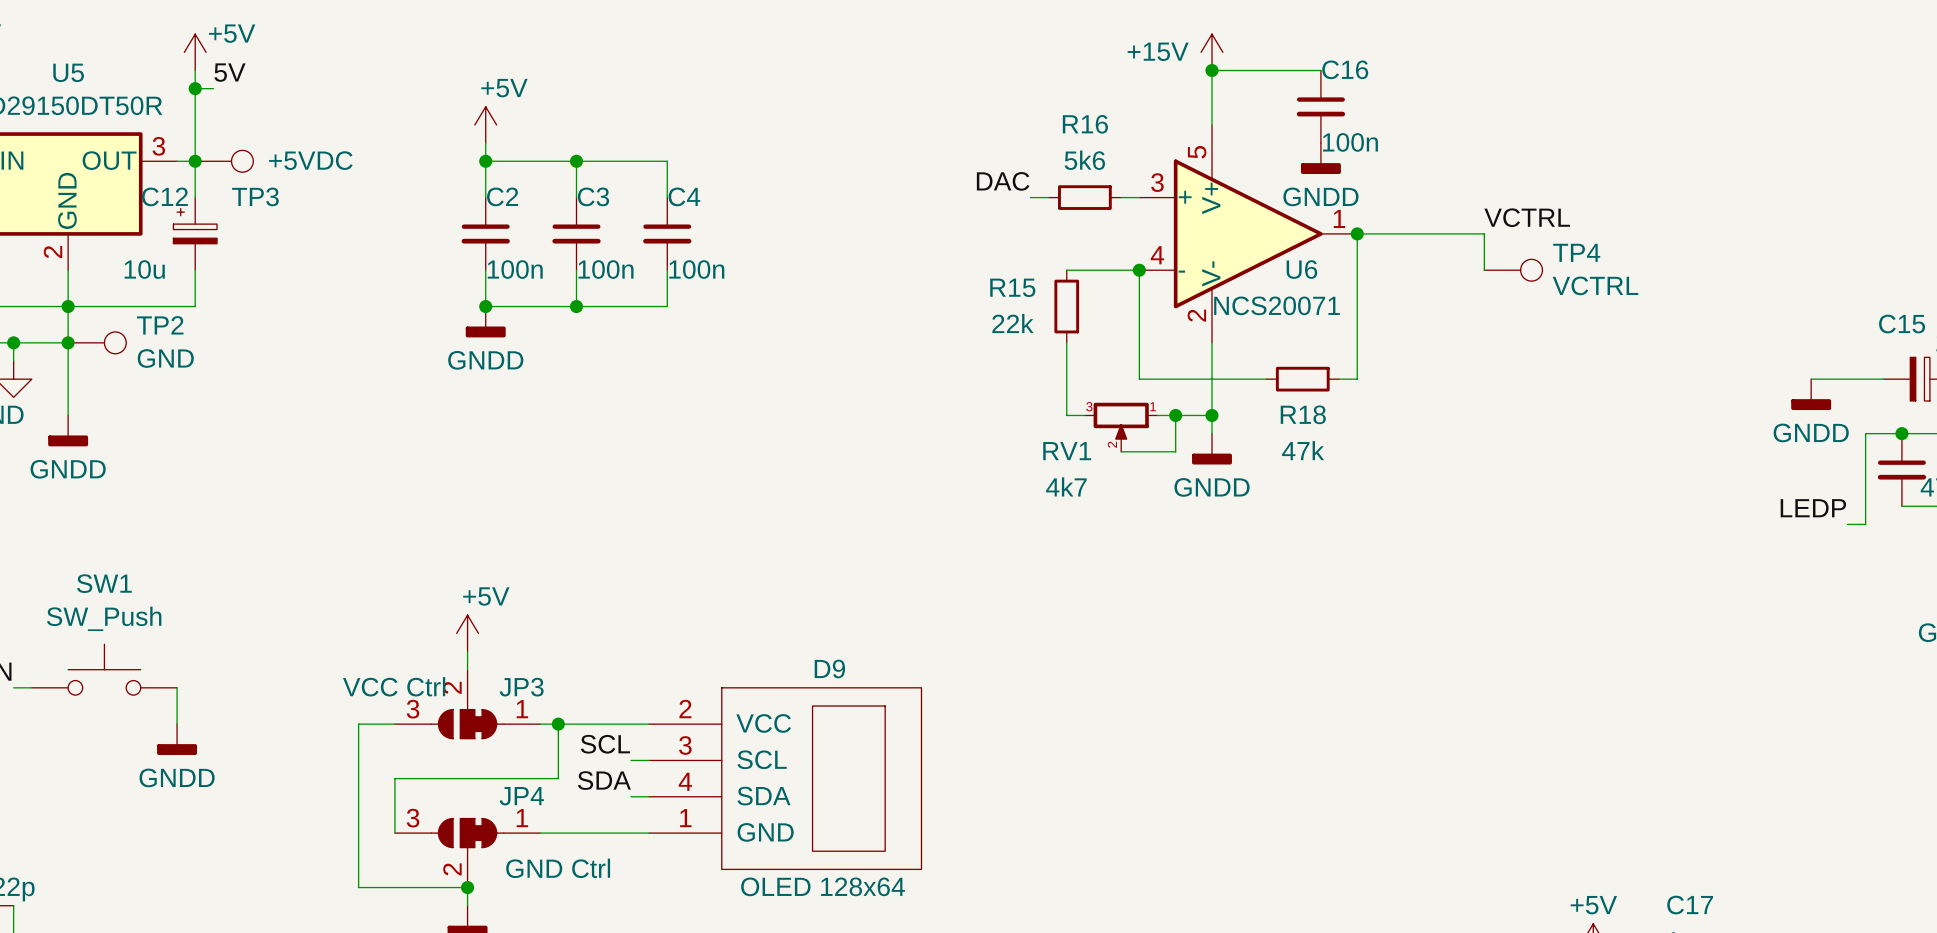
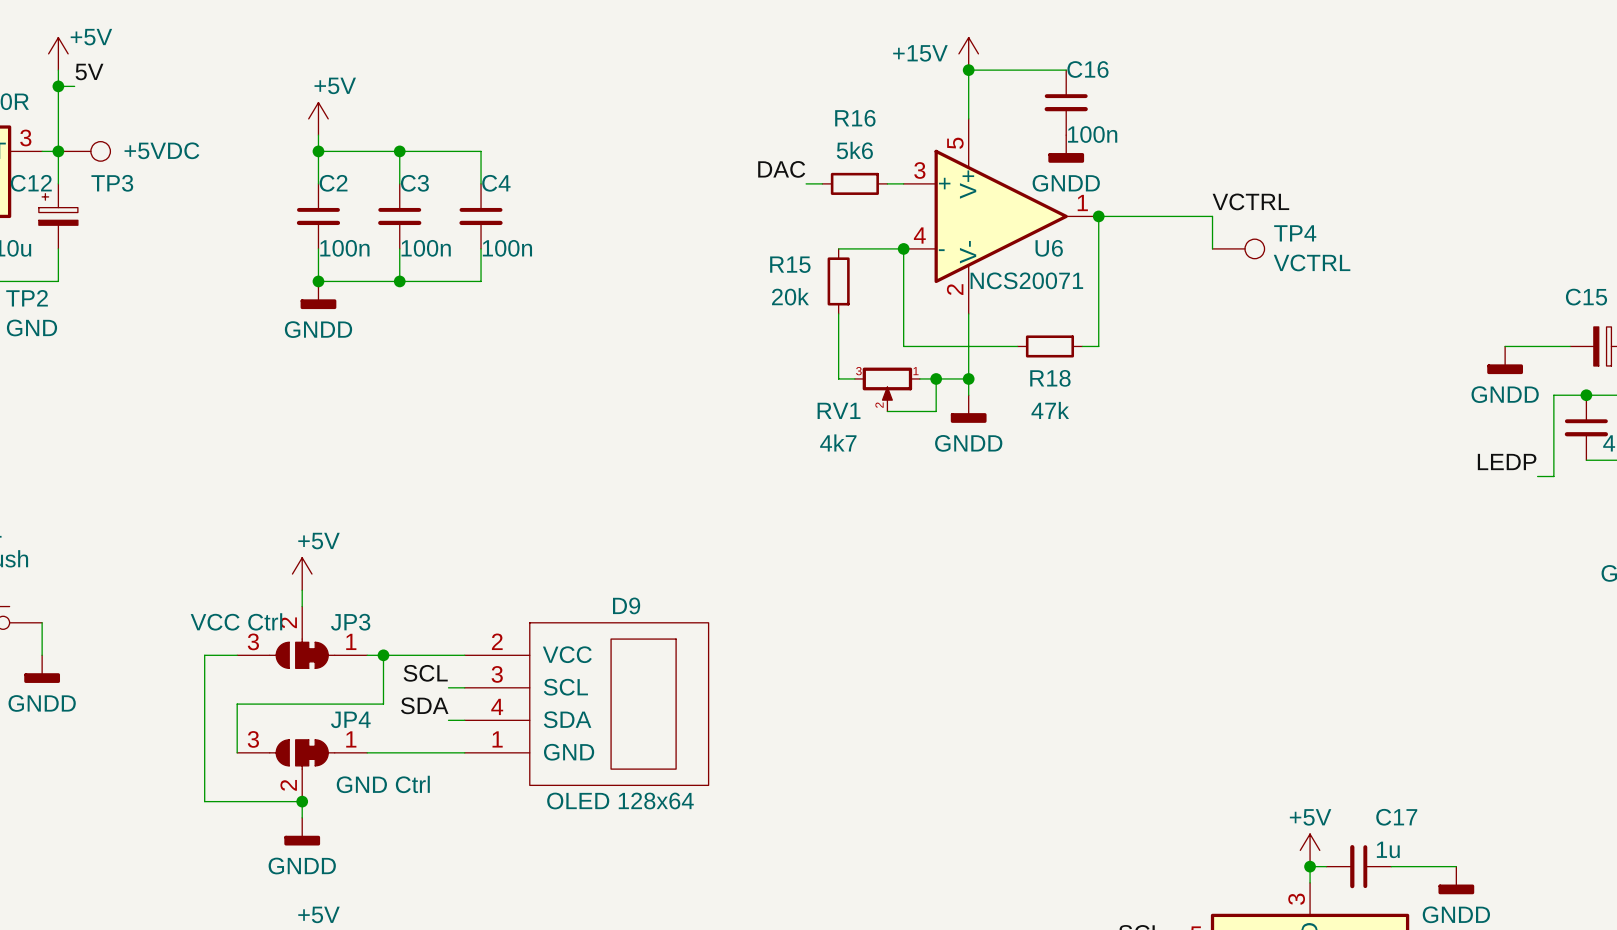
R15 value: 22k (1012, 323) -> 20k (790, 296)

